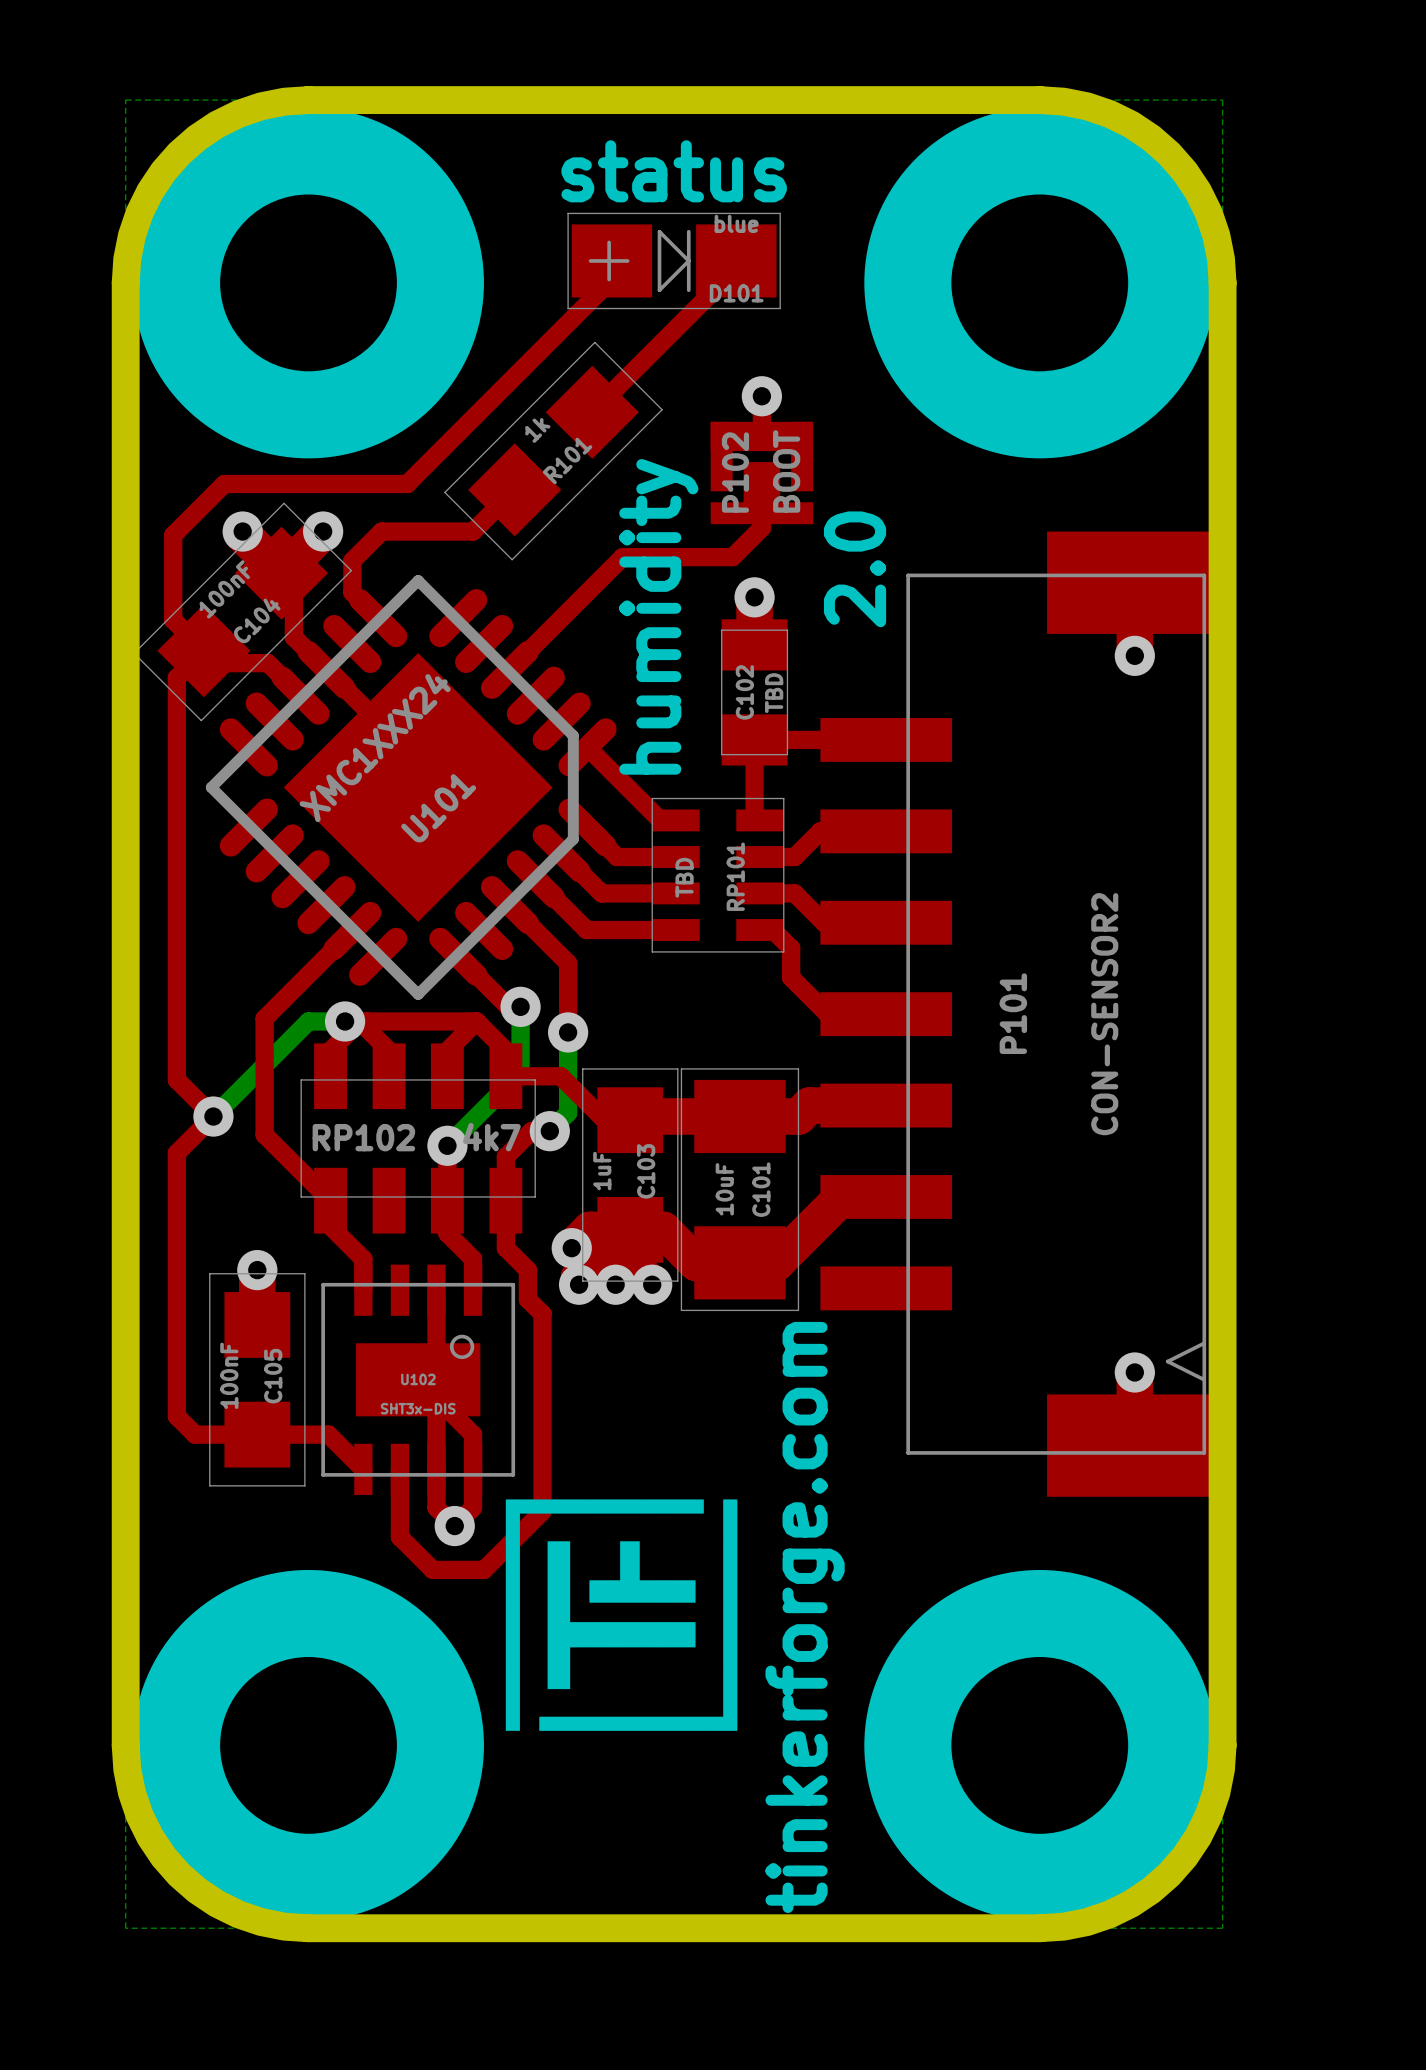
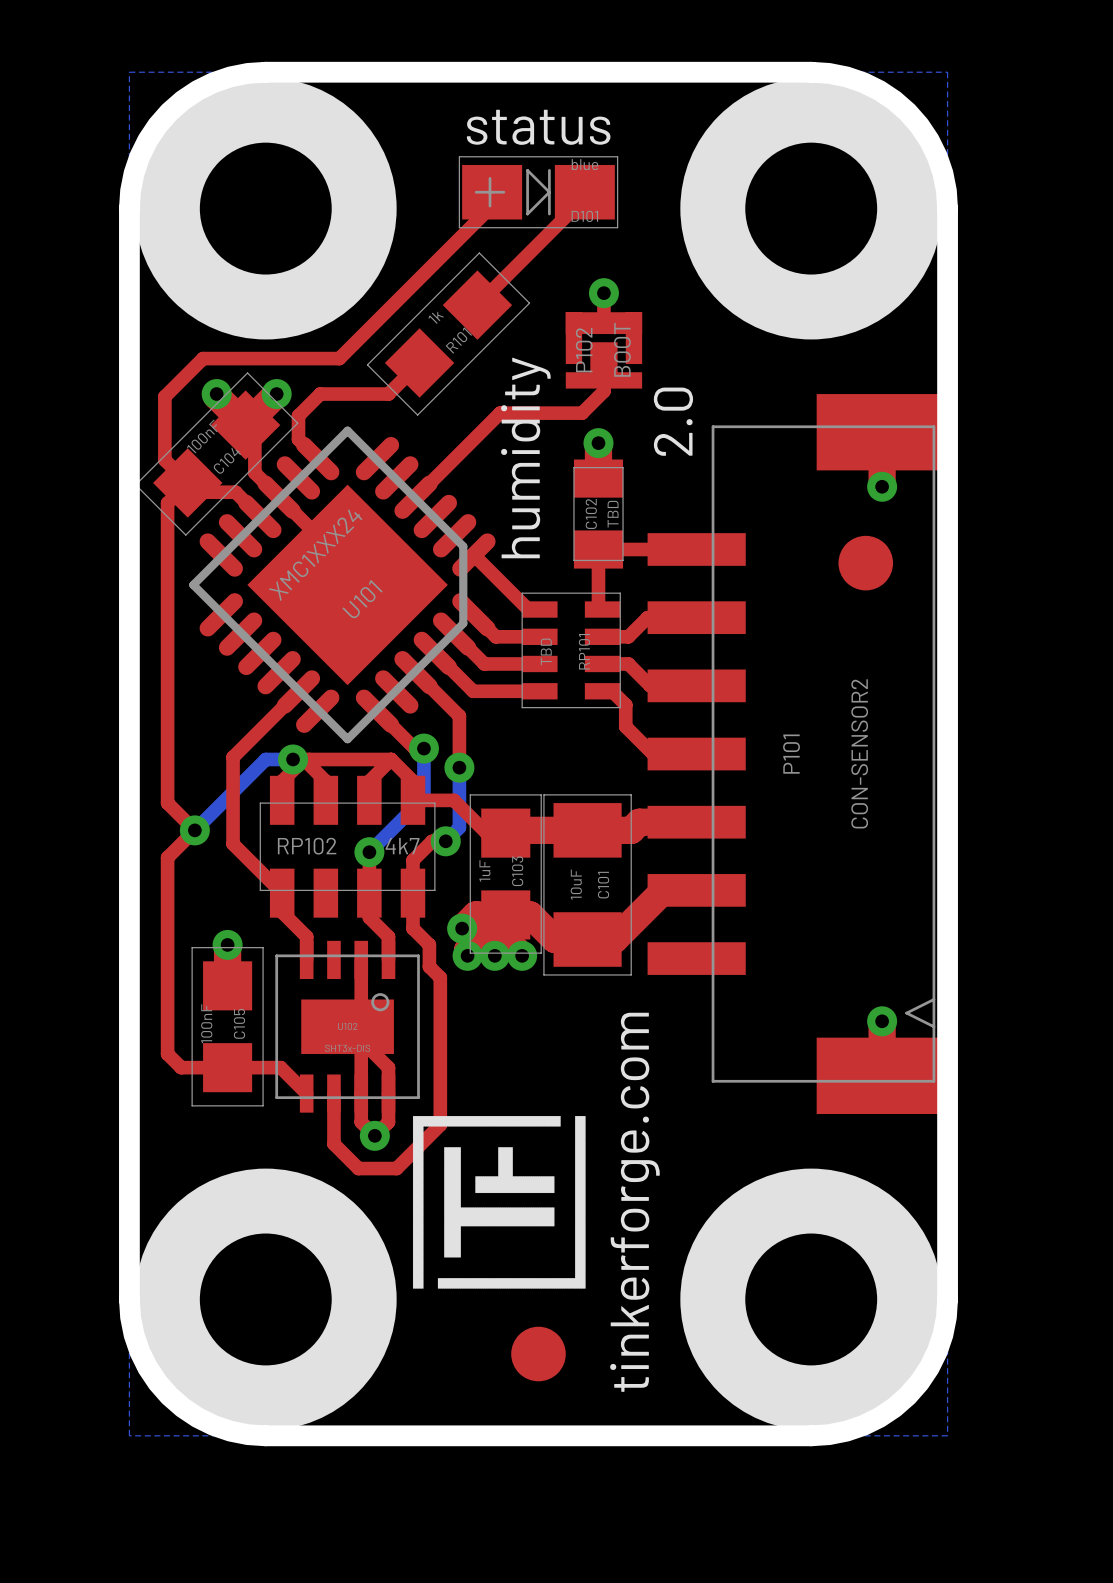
part: none -> (865, 563)
part: none -> (538, 1354)

